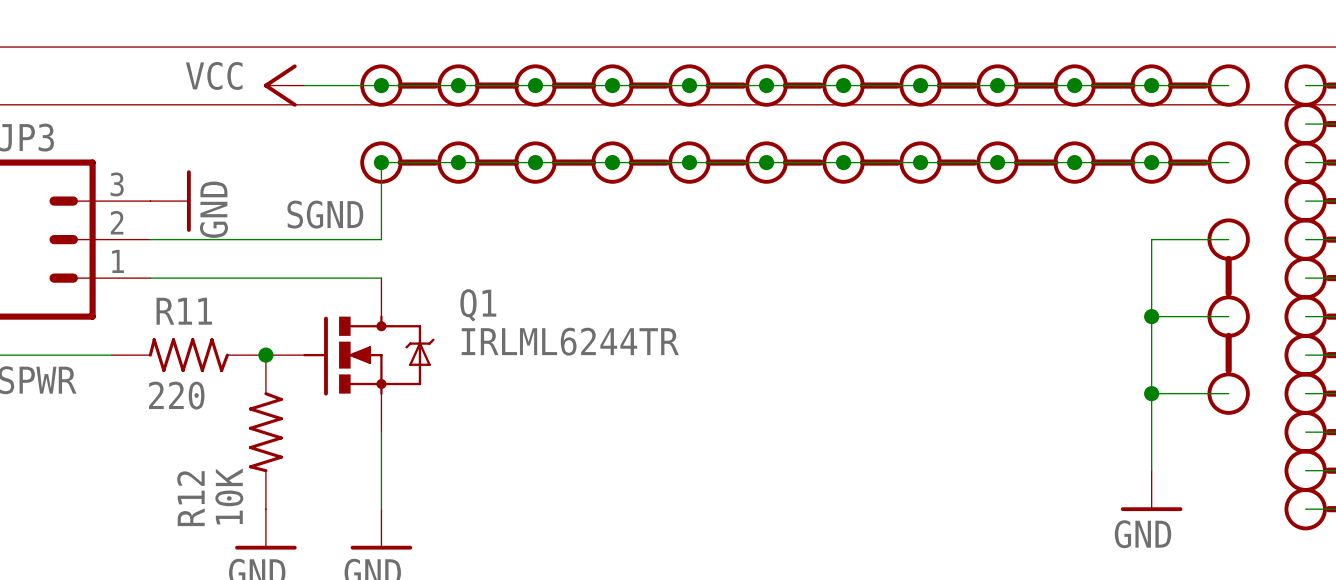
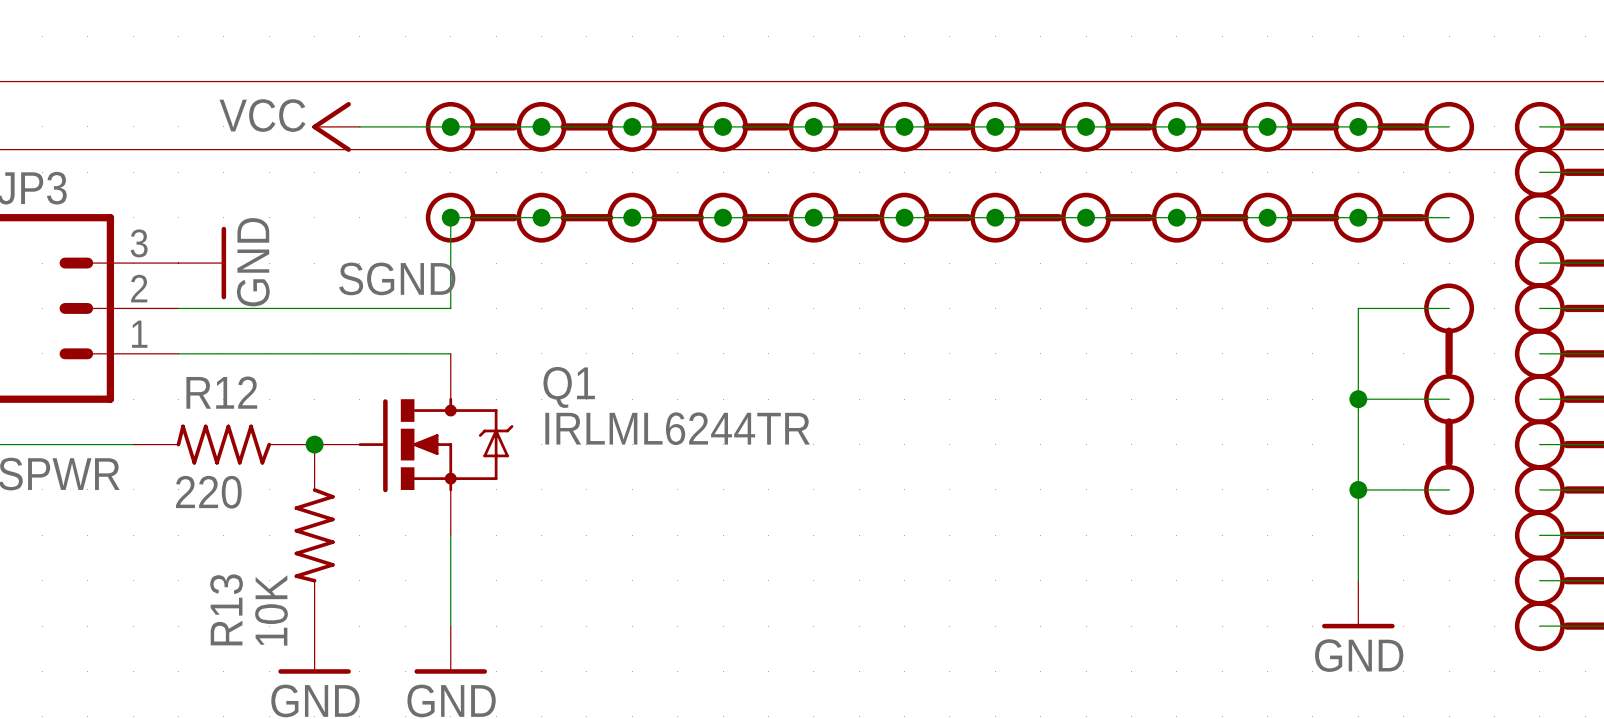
R11 name: R11 (184, 311) -> R12 (221, 392)
R12 name: R12 (190, 498) -> R13 (226, 609)

